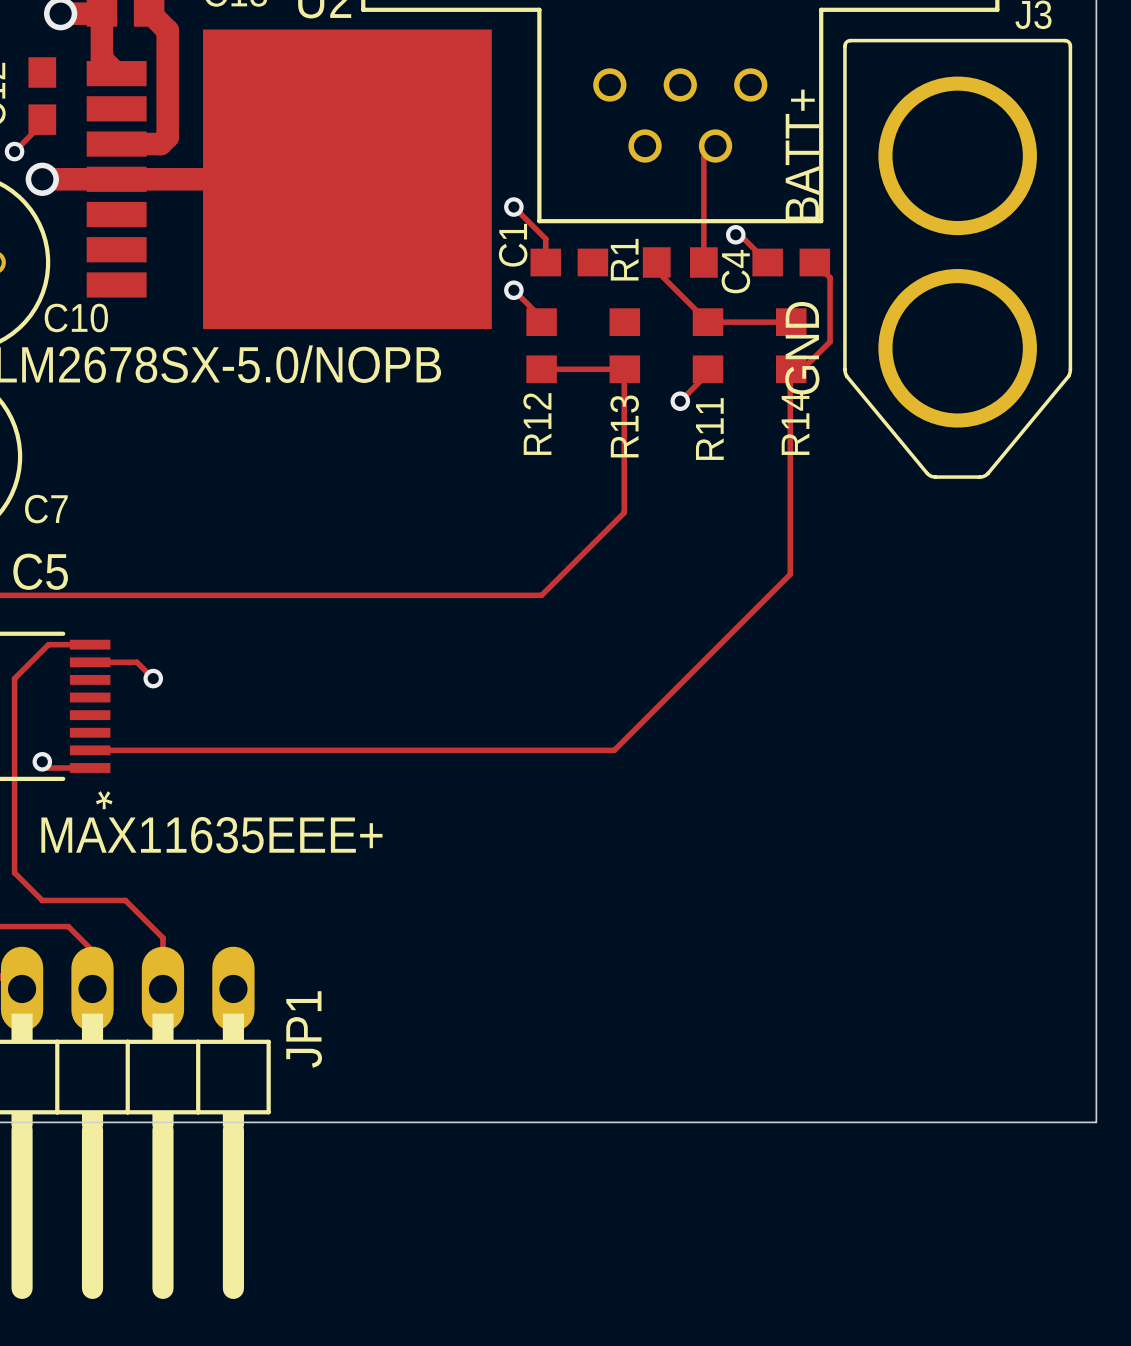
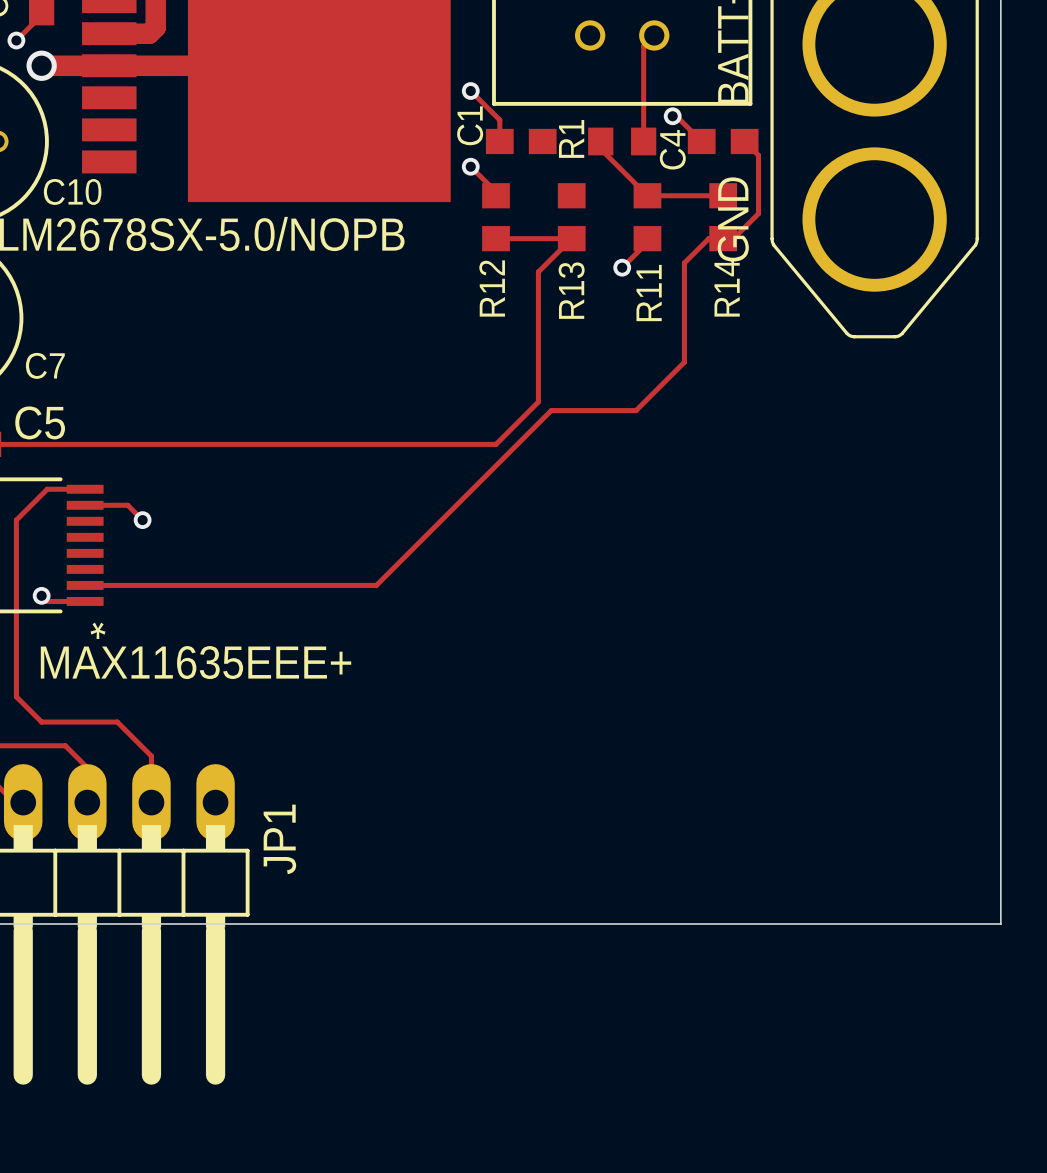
track: (624, 369) (624, 512) (588, 548) -> (571, 239) (538, 271) (538, 401)
track: (790, 369) (790, 574) (614, 750) (410, 750) -> (722, 238) (708, 238) (684, 263) (684, 362) (636, 410) (551, 410) (376, 585)

